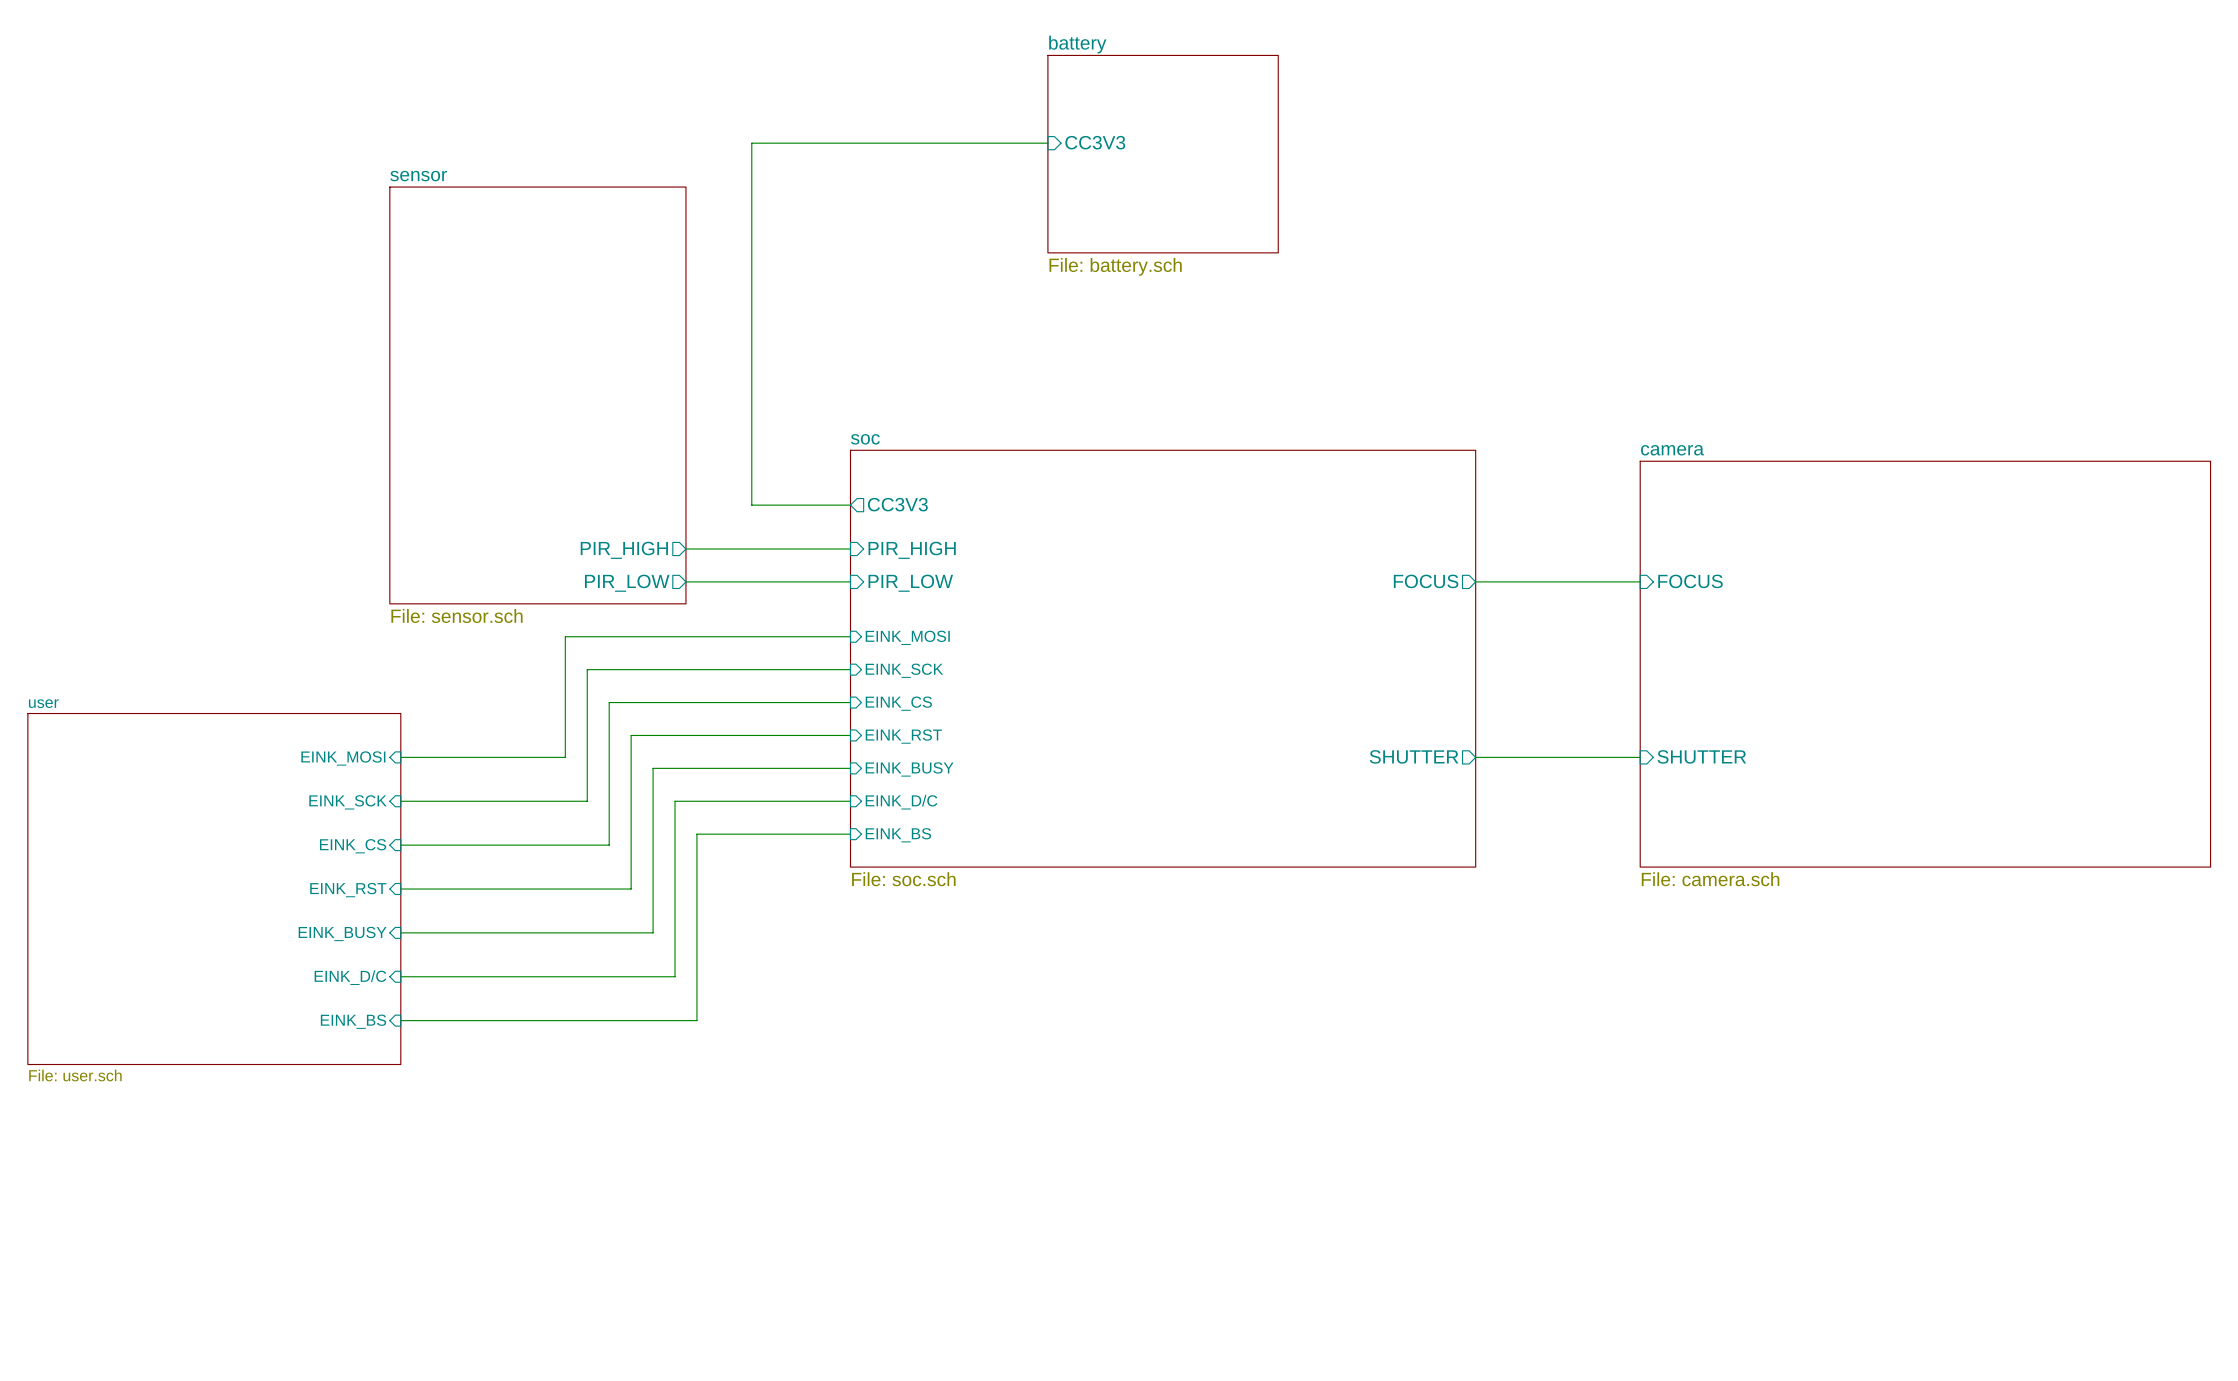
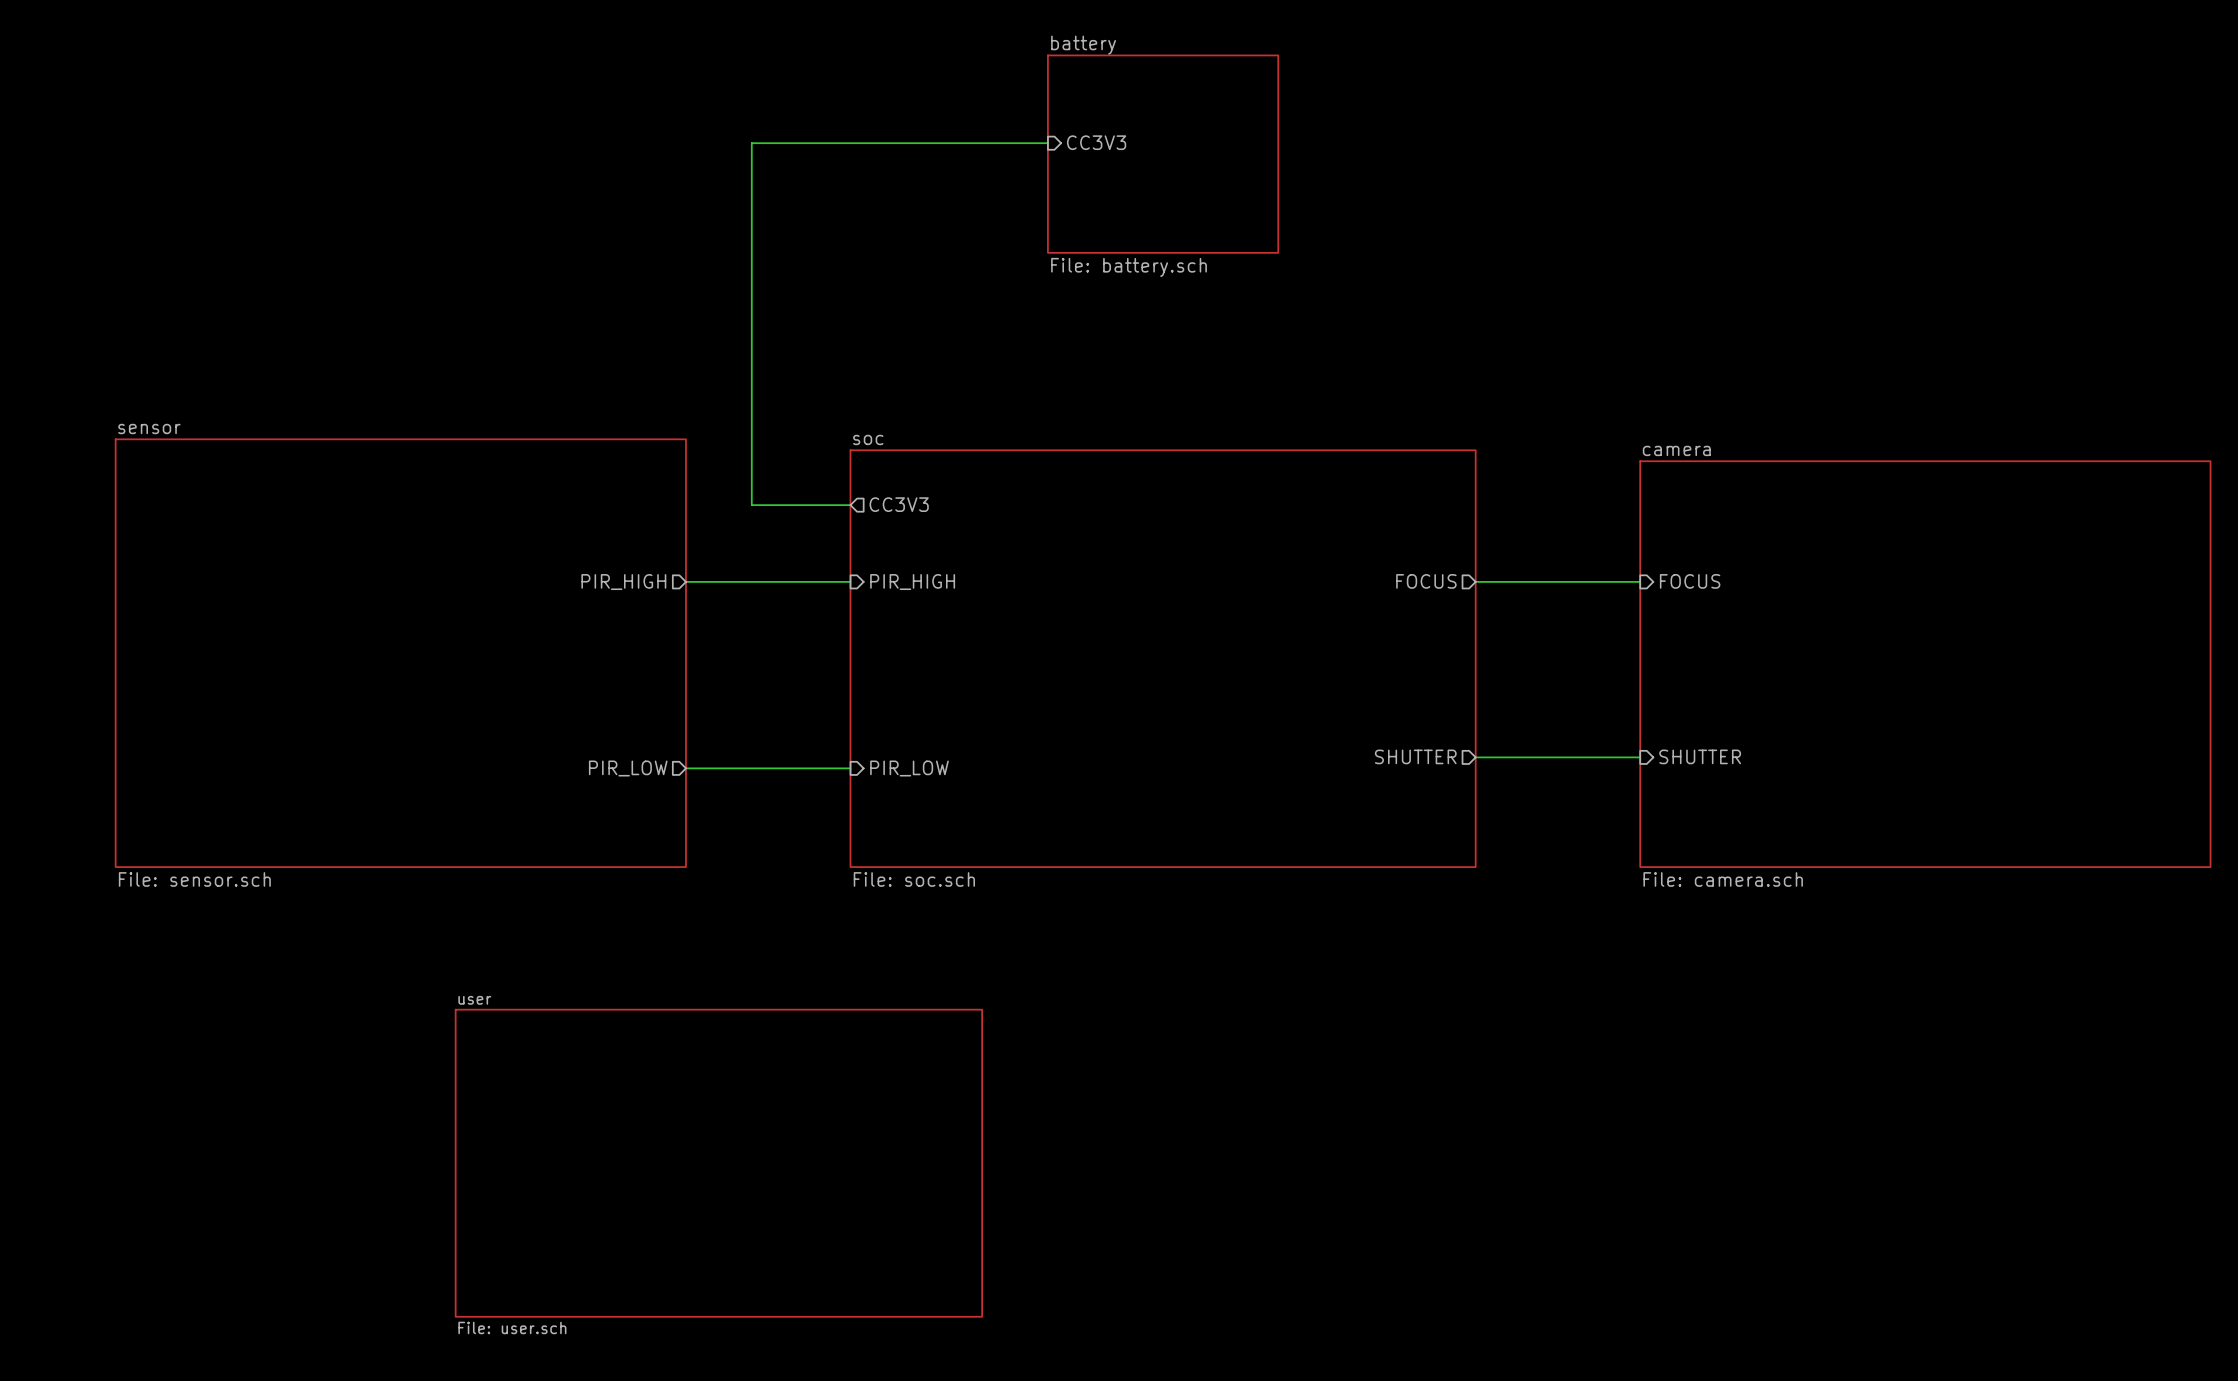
sheet sensor: File: sensor.sch (537, 395) -> none
wire: (685, 549) (850, 549) -> none
sheet pin: PIR_HIGH (624, 550) -> none
sheet pin: PIR_HIGH (912, 550) -> none
sheet pin: PIR_LOW (627, 583) -> PIR_HIGH (623, 582)
sheet pin: PIR_LOW (910, 583) -> PIR_HIGH (912, 582)
wire: (850, 636) (565, 636) (565, 757) (400, 757) -> none
sheet pin: EINK_MOSI (907, 637) -> none
sheet sensor: none -> File: sensor.sch (400, 653)
wire: (850, 669) (587, 669) (587, 801) (400, 801) -> none
sheet pin: EINK_SCK (904, 670) -> none
wire: (850, 702) (609, 702) (609, 845) (400, 845) -> none
sheet pin: EINK_CS (898, 703) -> none
wire: (850, 735) (631, 735) (631, 889) (400, 889) -> none
sheet pin: EINK_RST (903, 736) -> none
sheet pin: EINK_MOSI (343, 758) -> none
wire: (685, 768) (653, 768) (653, 932) (400, 932) -> none
sheet pin: none -> PIR_LOW (628, 768)
sheet pin: EINK_BUSY (909, 769) -> PIR_LOW (909, 768)
wire: (850, 801) (675, 801) (675, 976) (400, 976) -> none
sheet pin: EINK_SCK (348, 802) -> none
sheet pin: EINK_D/C (901, 802) -> none
wire: (850, 834) (696, 834) (696, 1020) (400, 1020) -> none
sheet pin: EINK_BS (898, 835) -> none
sheet pin: EINK_CS (353, 846) -> none
sheet user: File: user.sch (214, 889) -> none
sheet pin: EINK_RST (348, 890) -> none
sheet pin: EINK_BUSY (342, 933) -> none
sheet pin: EINK_D/C (350, 977) -> none
sheet pin: EINK_BS (353, 1021) -> none
sheet user: none -> File: user.sch (718, 1163)

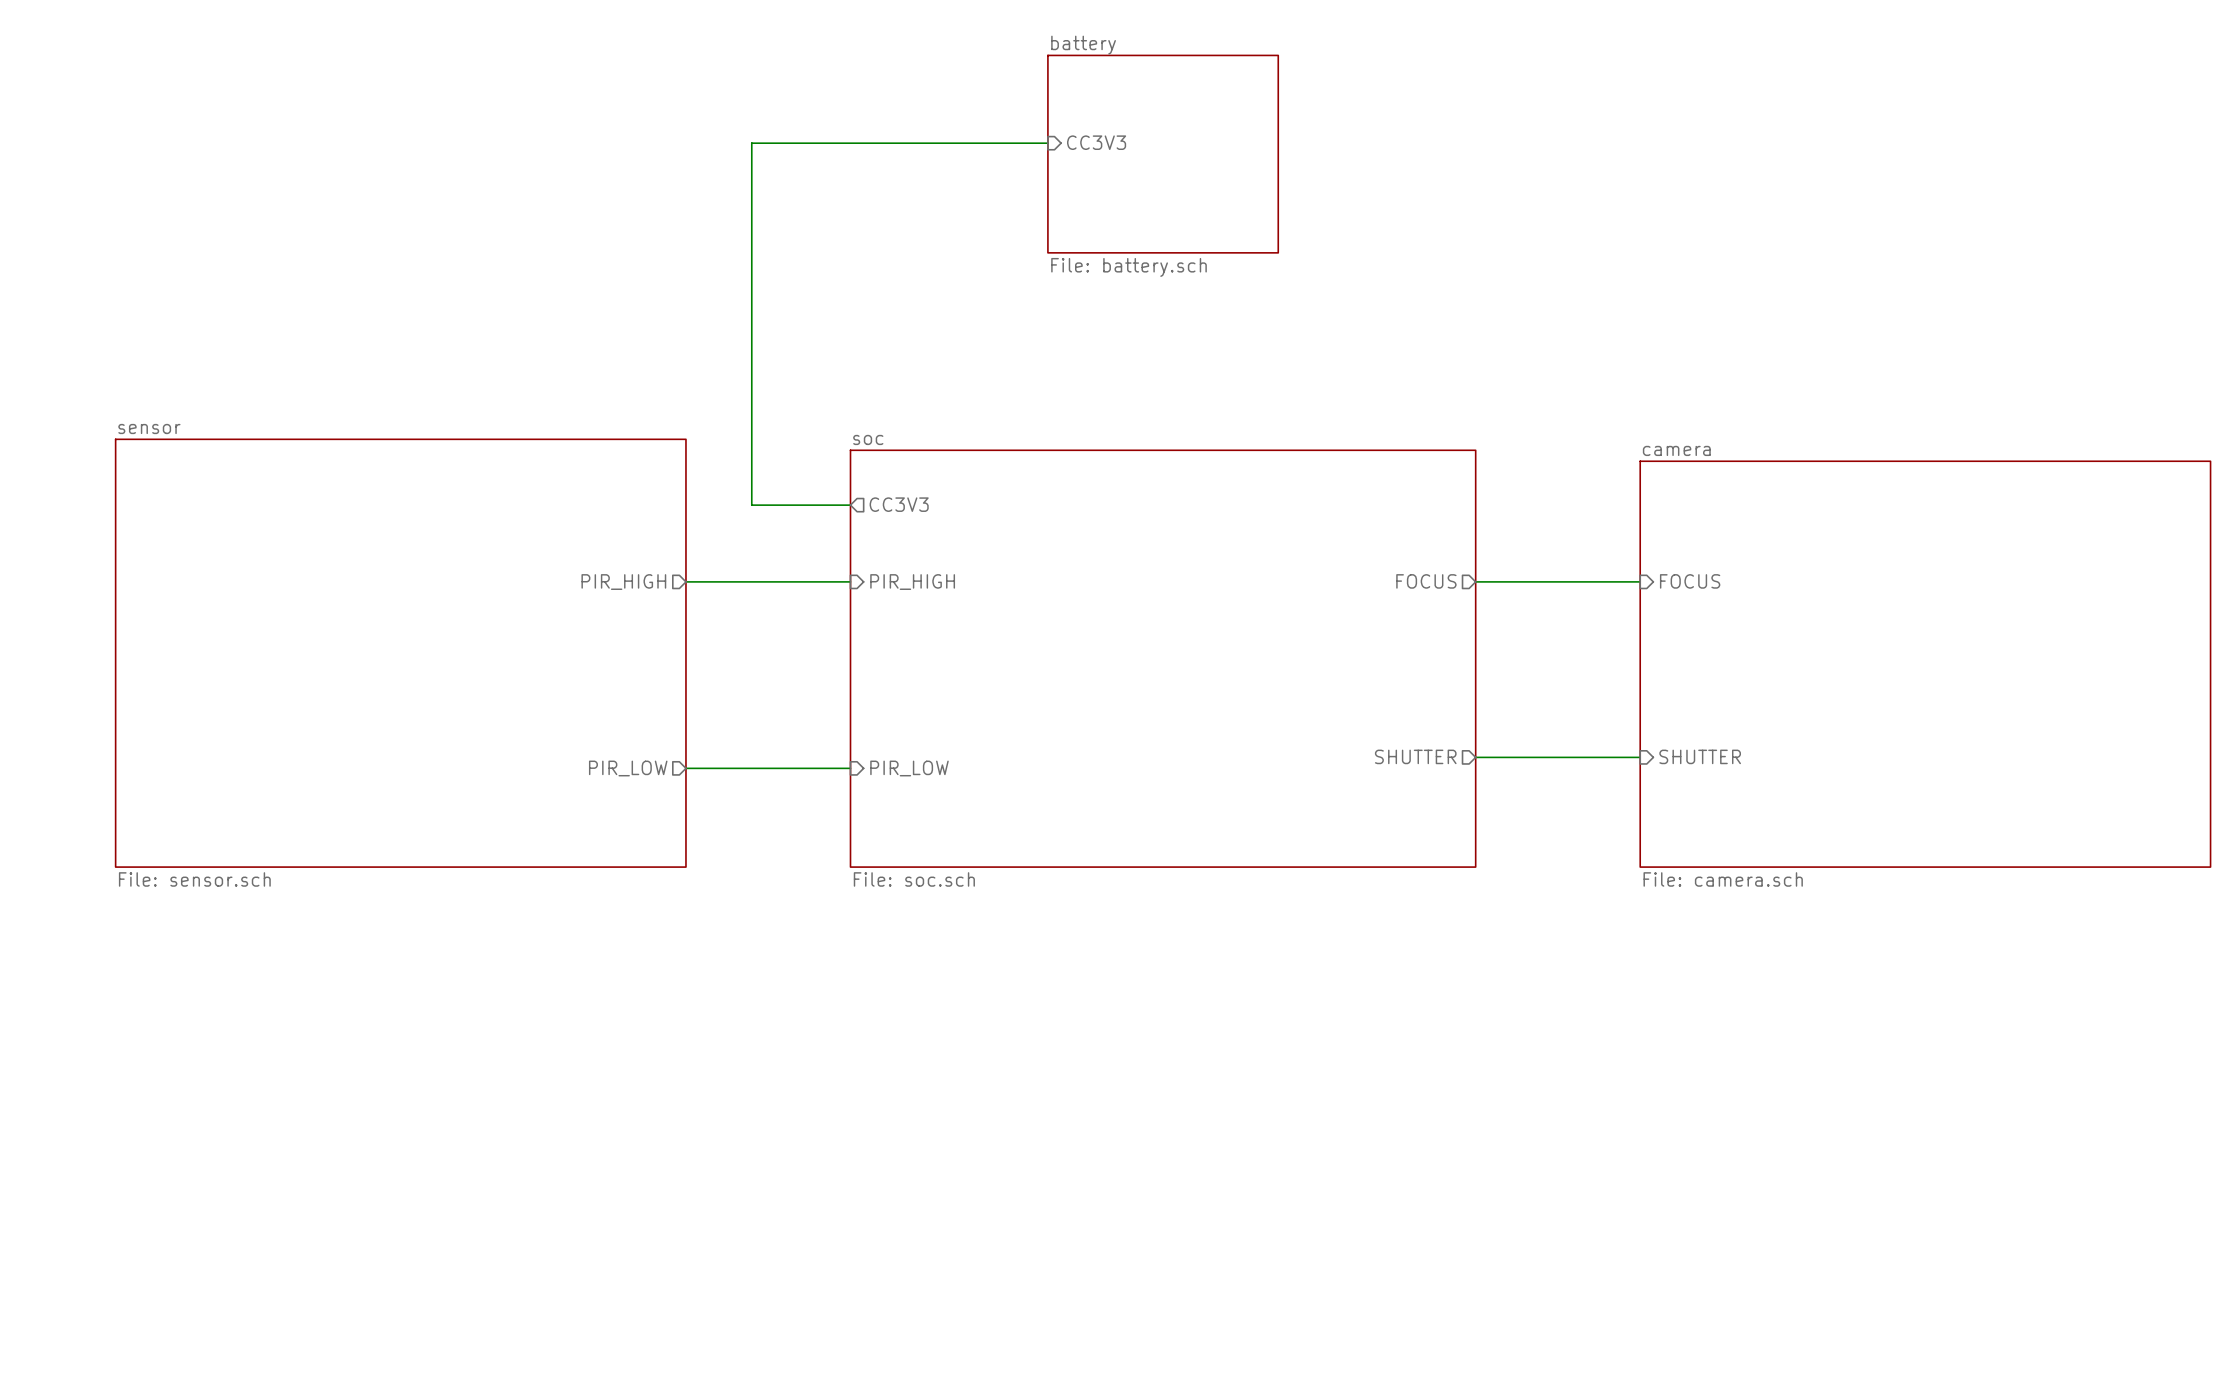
sheet user: File: user.sch (718, 1163) -> none

